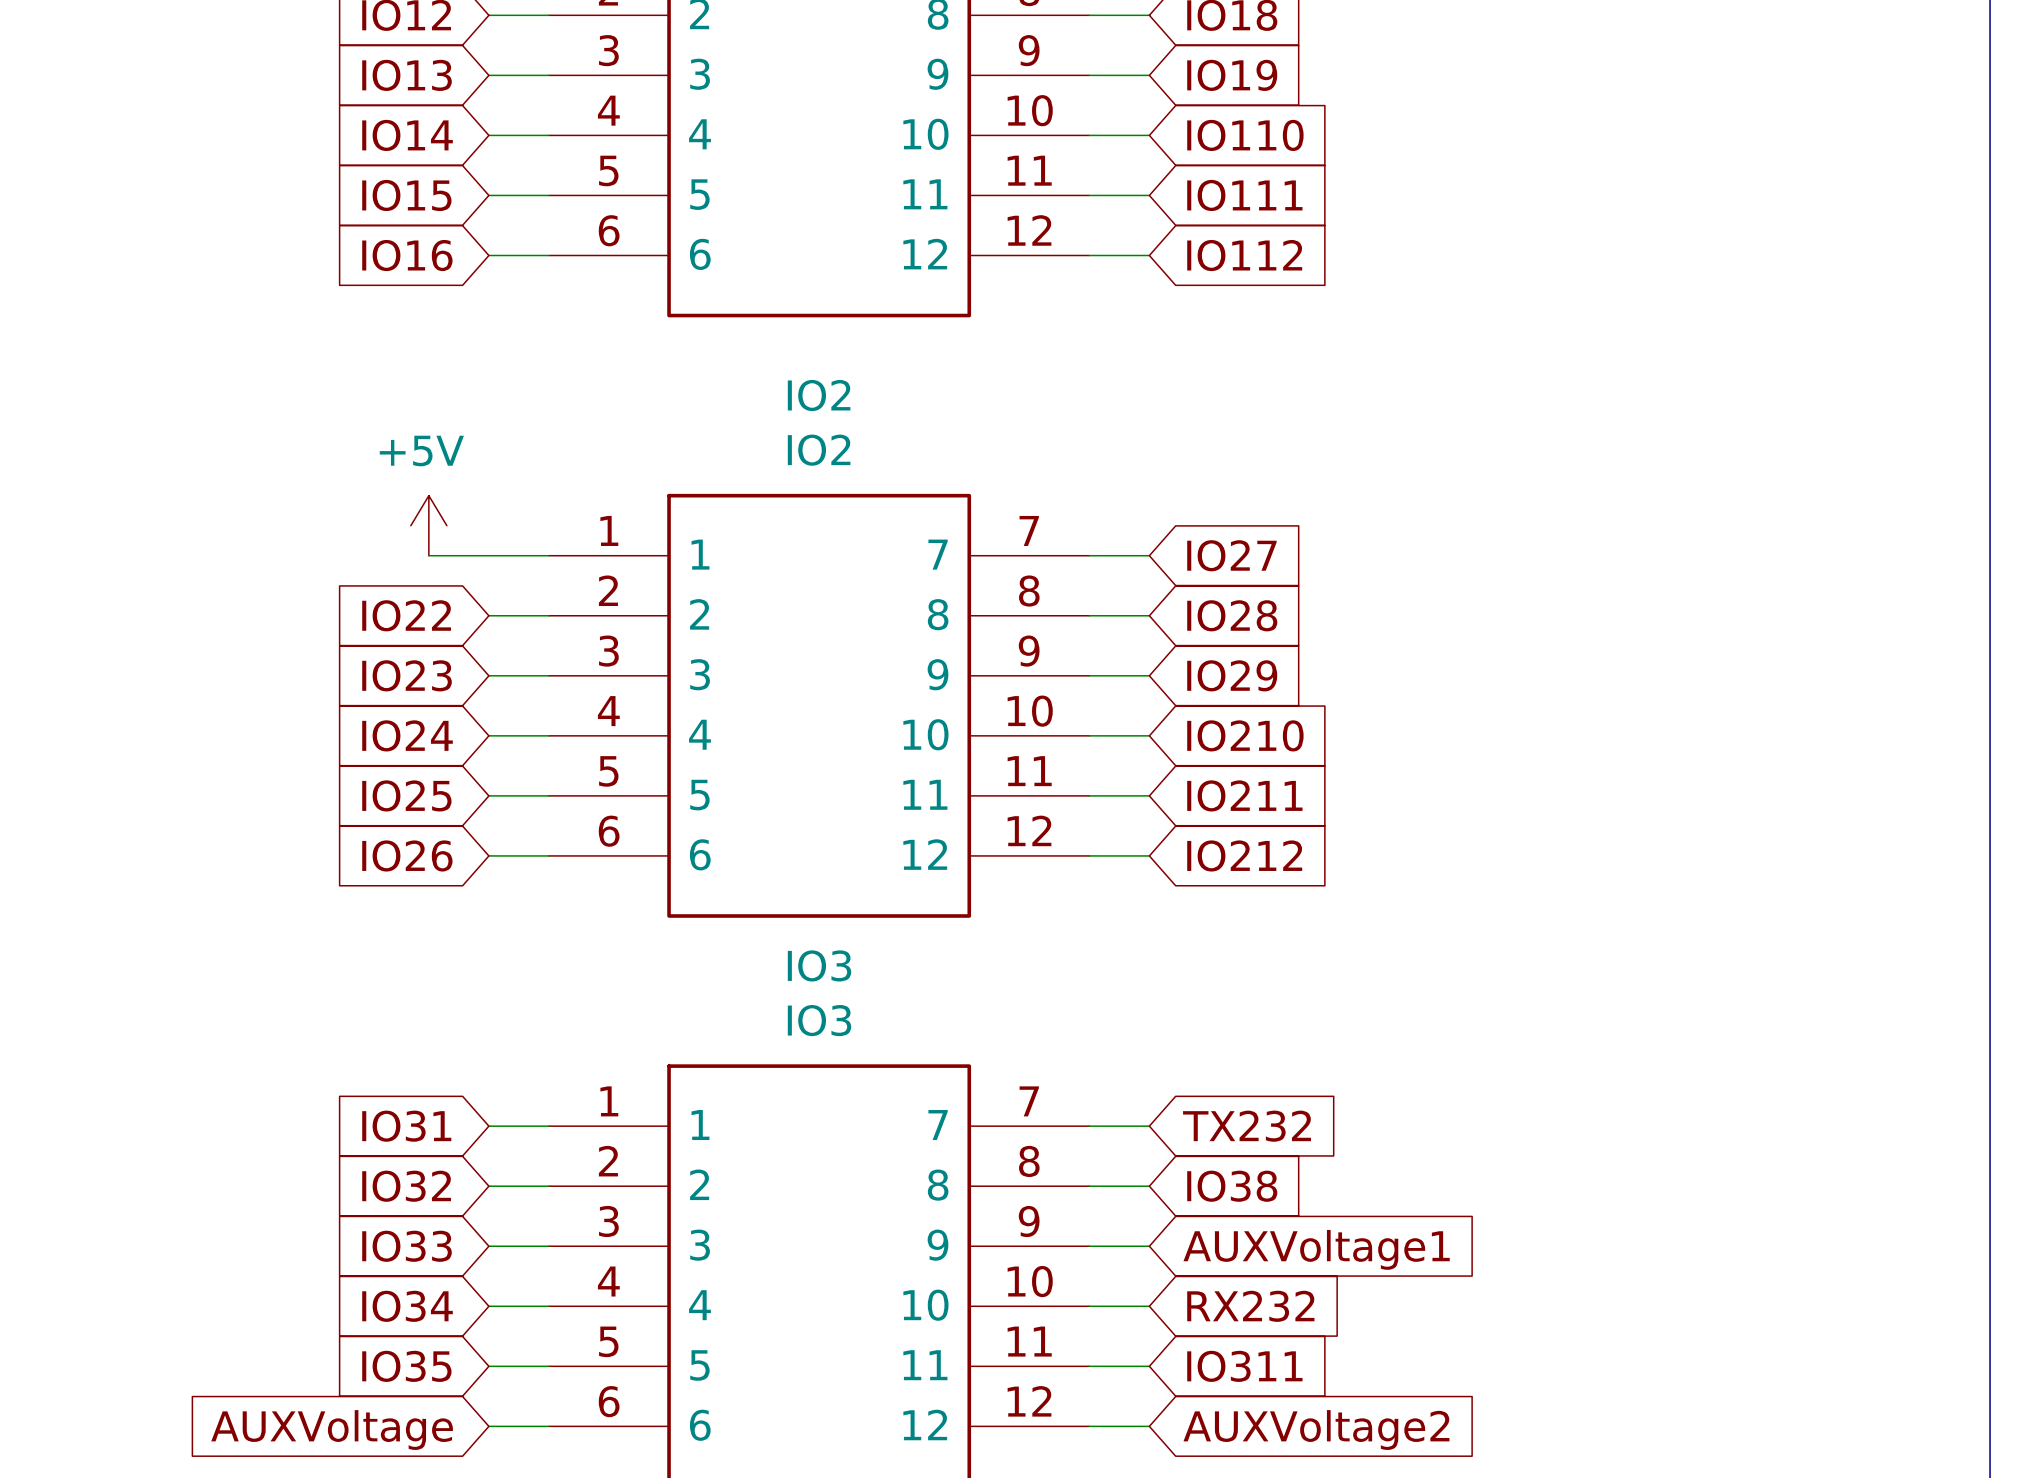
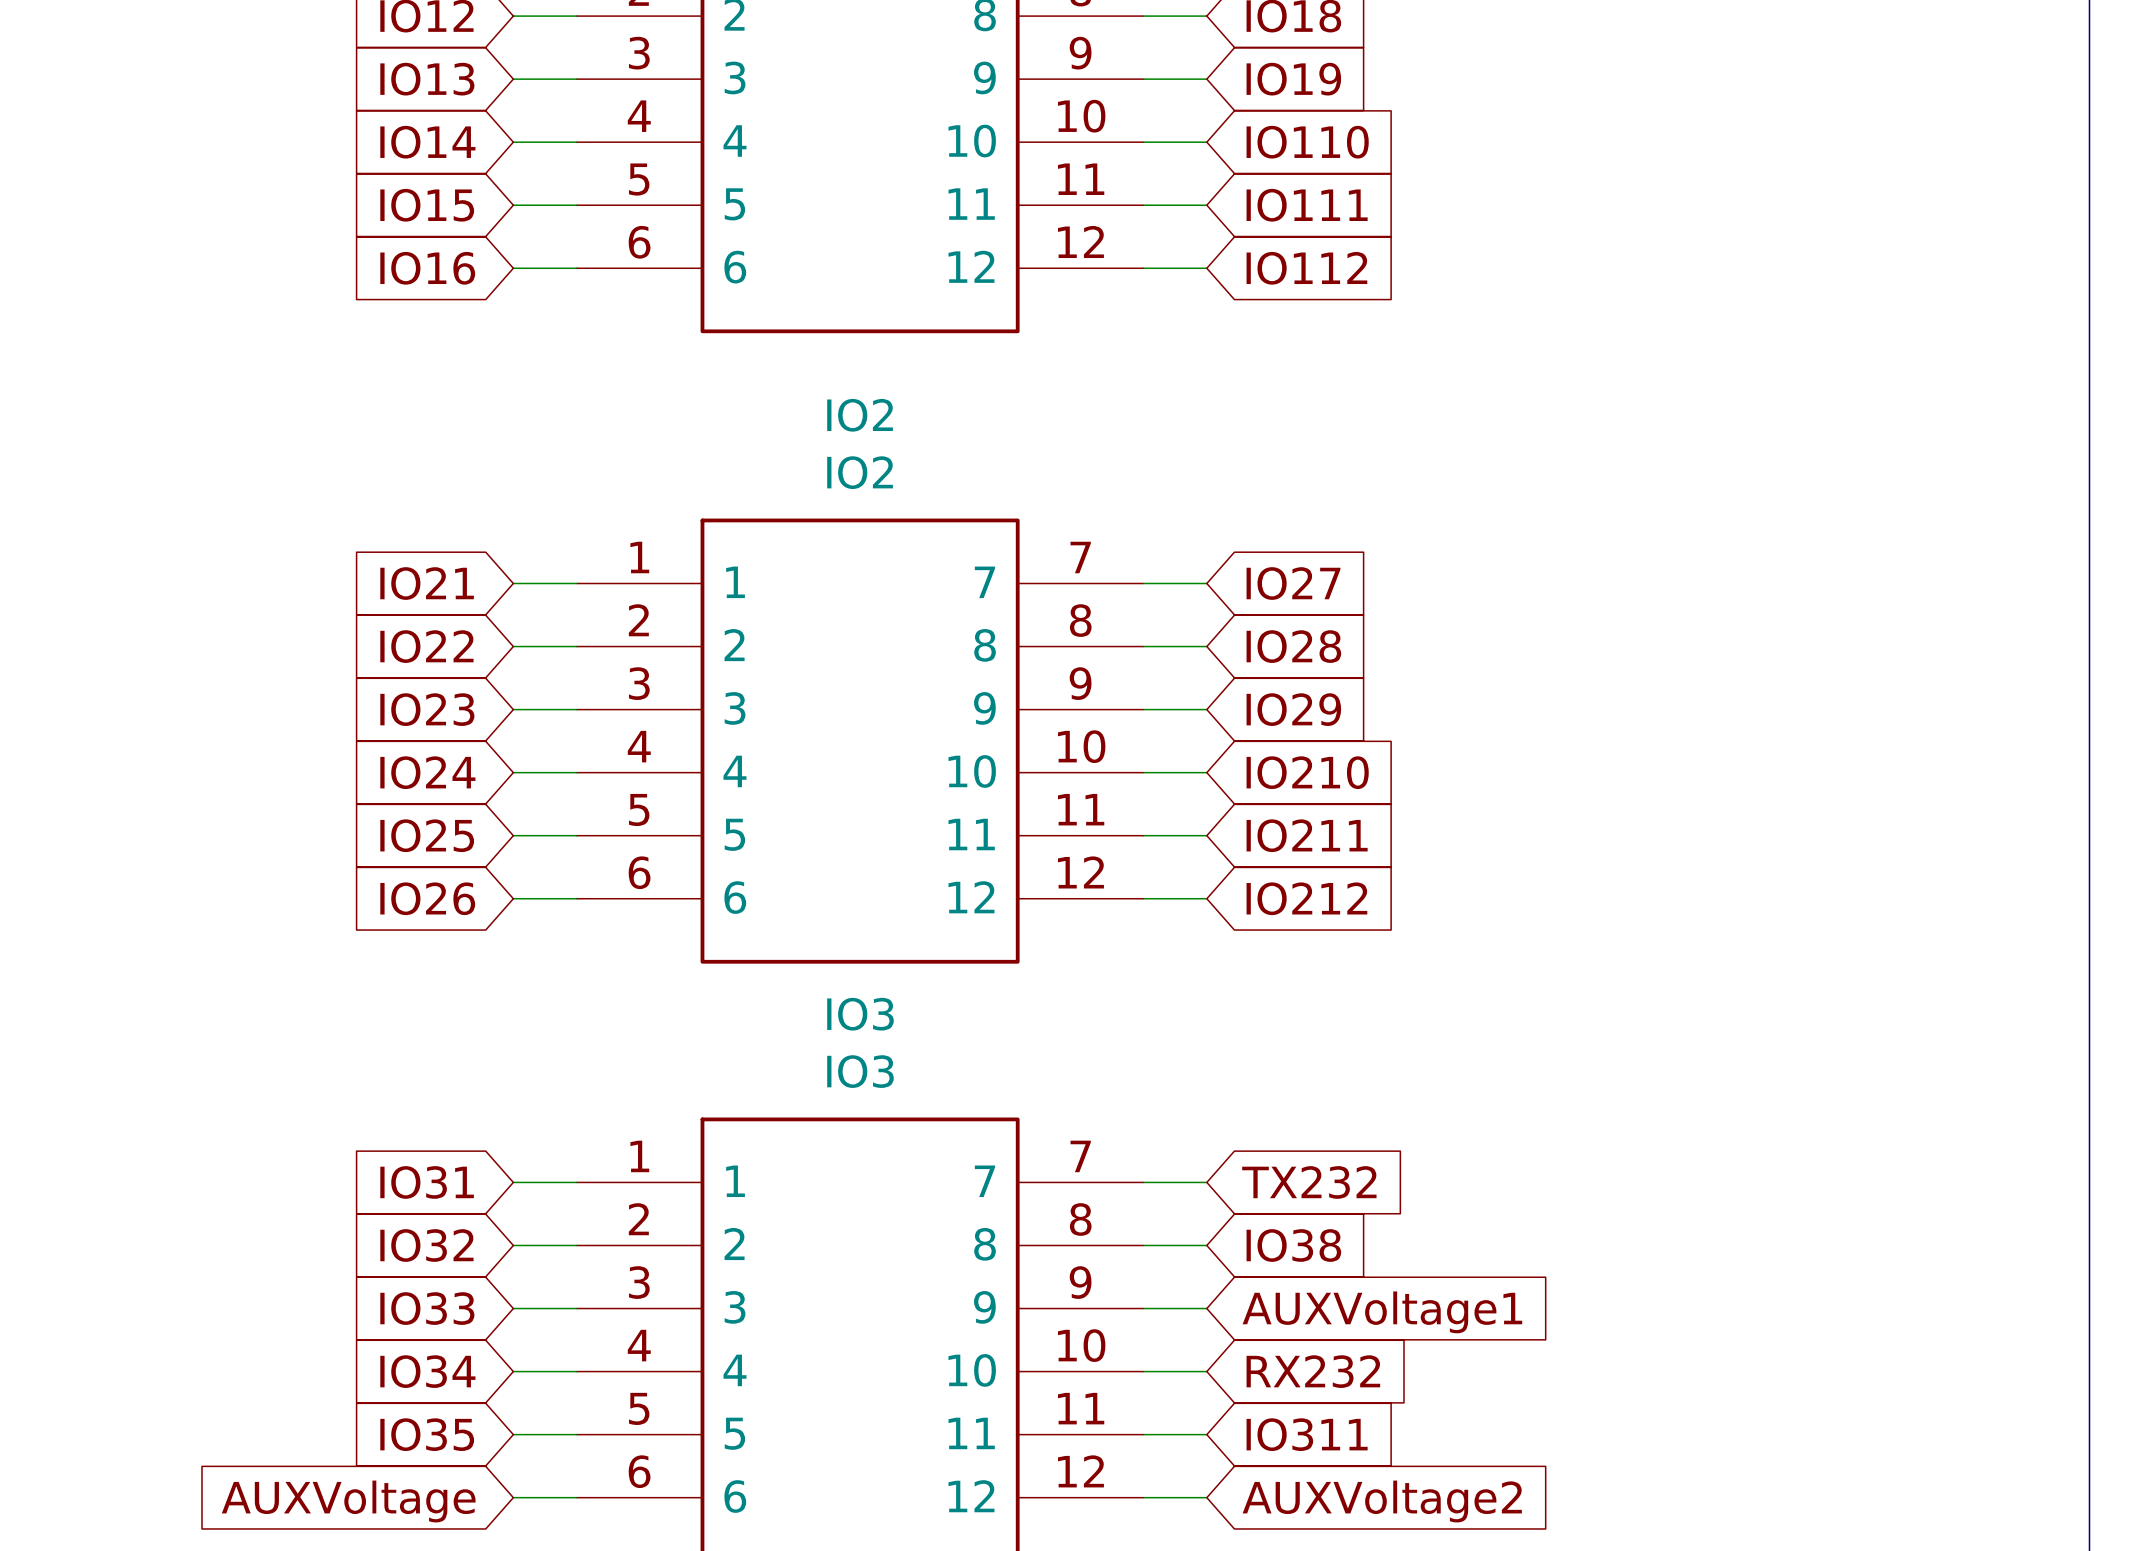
power symbol: +5V (428, 525) -> none
global label: none -> IO21 (427, 583)
wire: (428, 555) (488, 555) -> none

